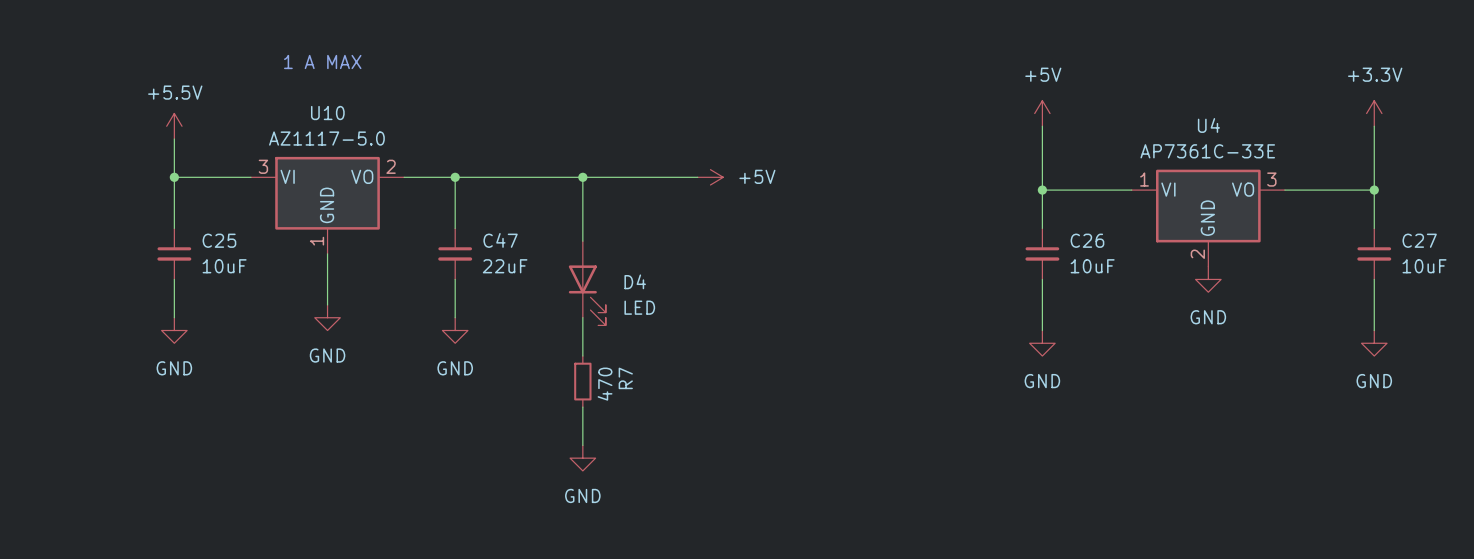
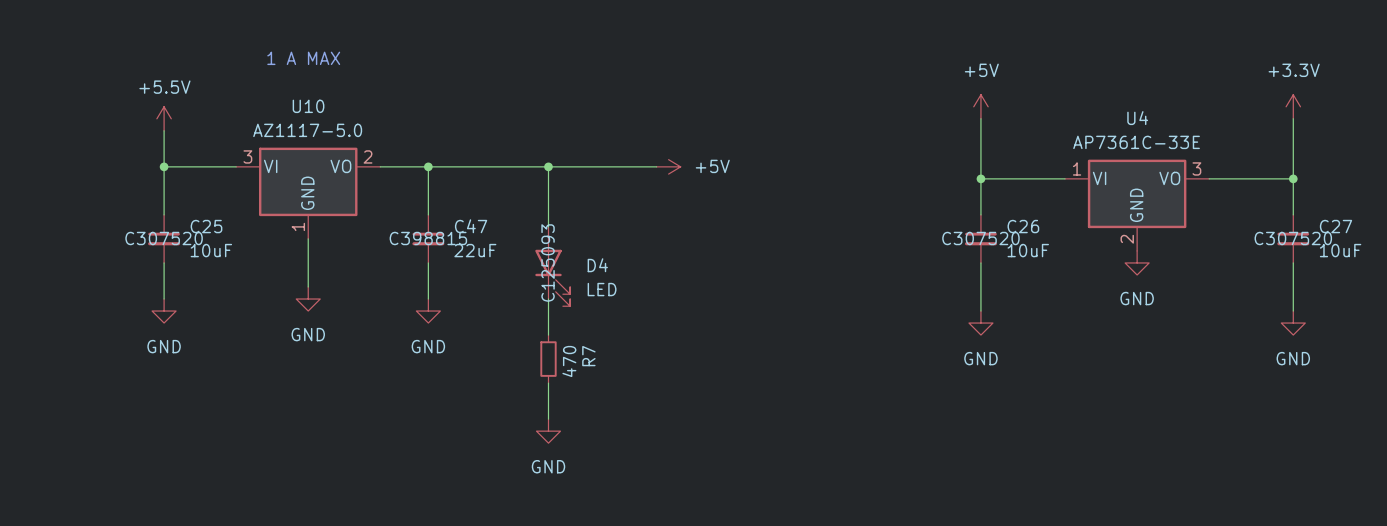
C25 text: none -> C307520 (164, 238)
C47 text: none -> C398815 (428, 238)
C26 text: none -> C307520 (980, 238)
C27 text: none -> C307520 (1293, 238)
D4 text: none -> C125093 (548, 262)

